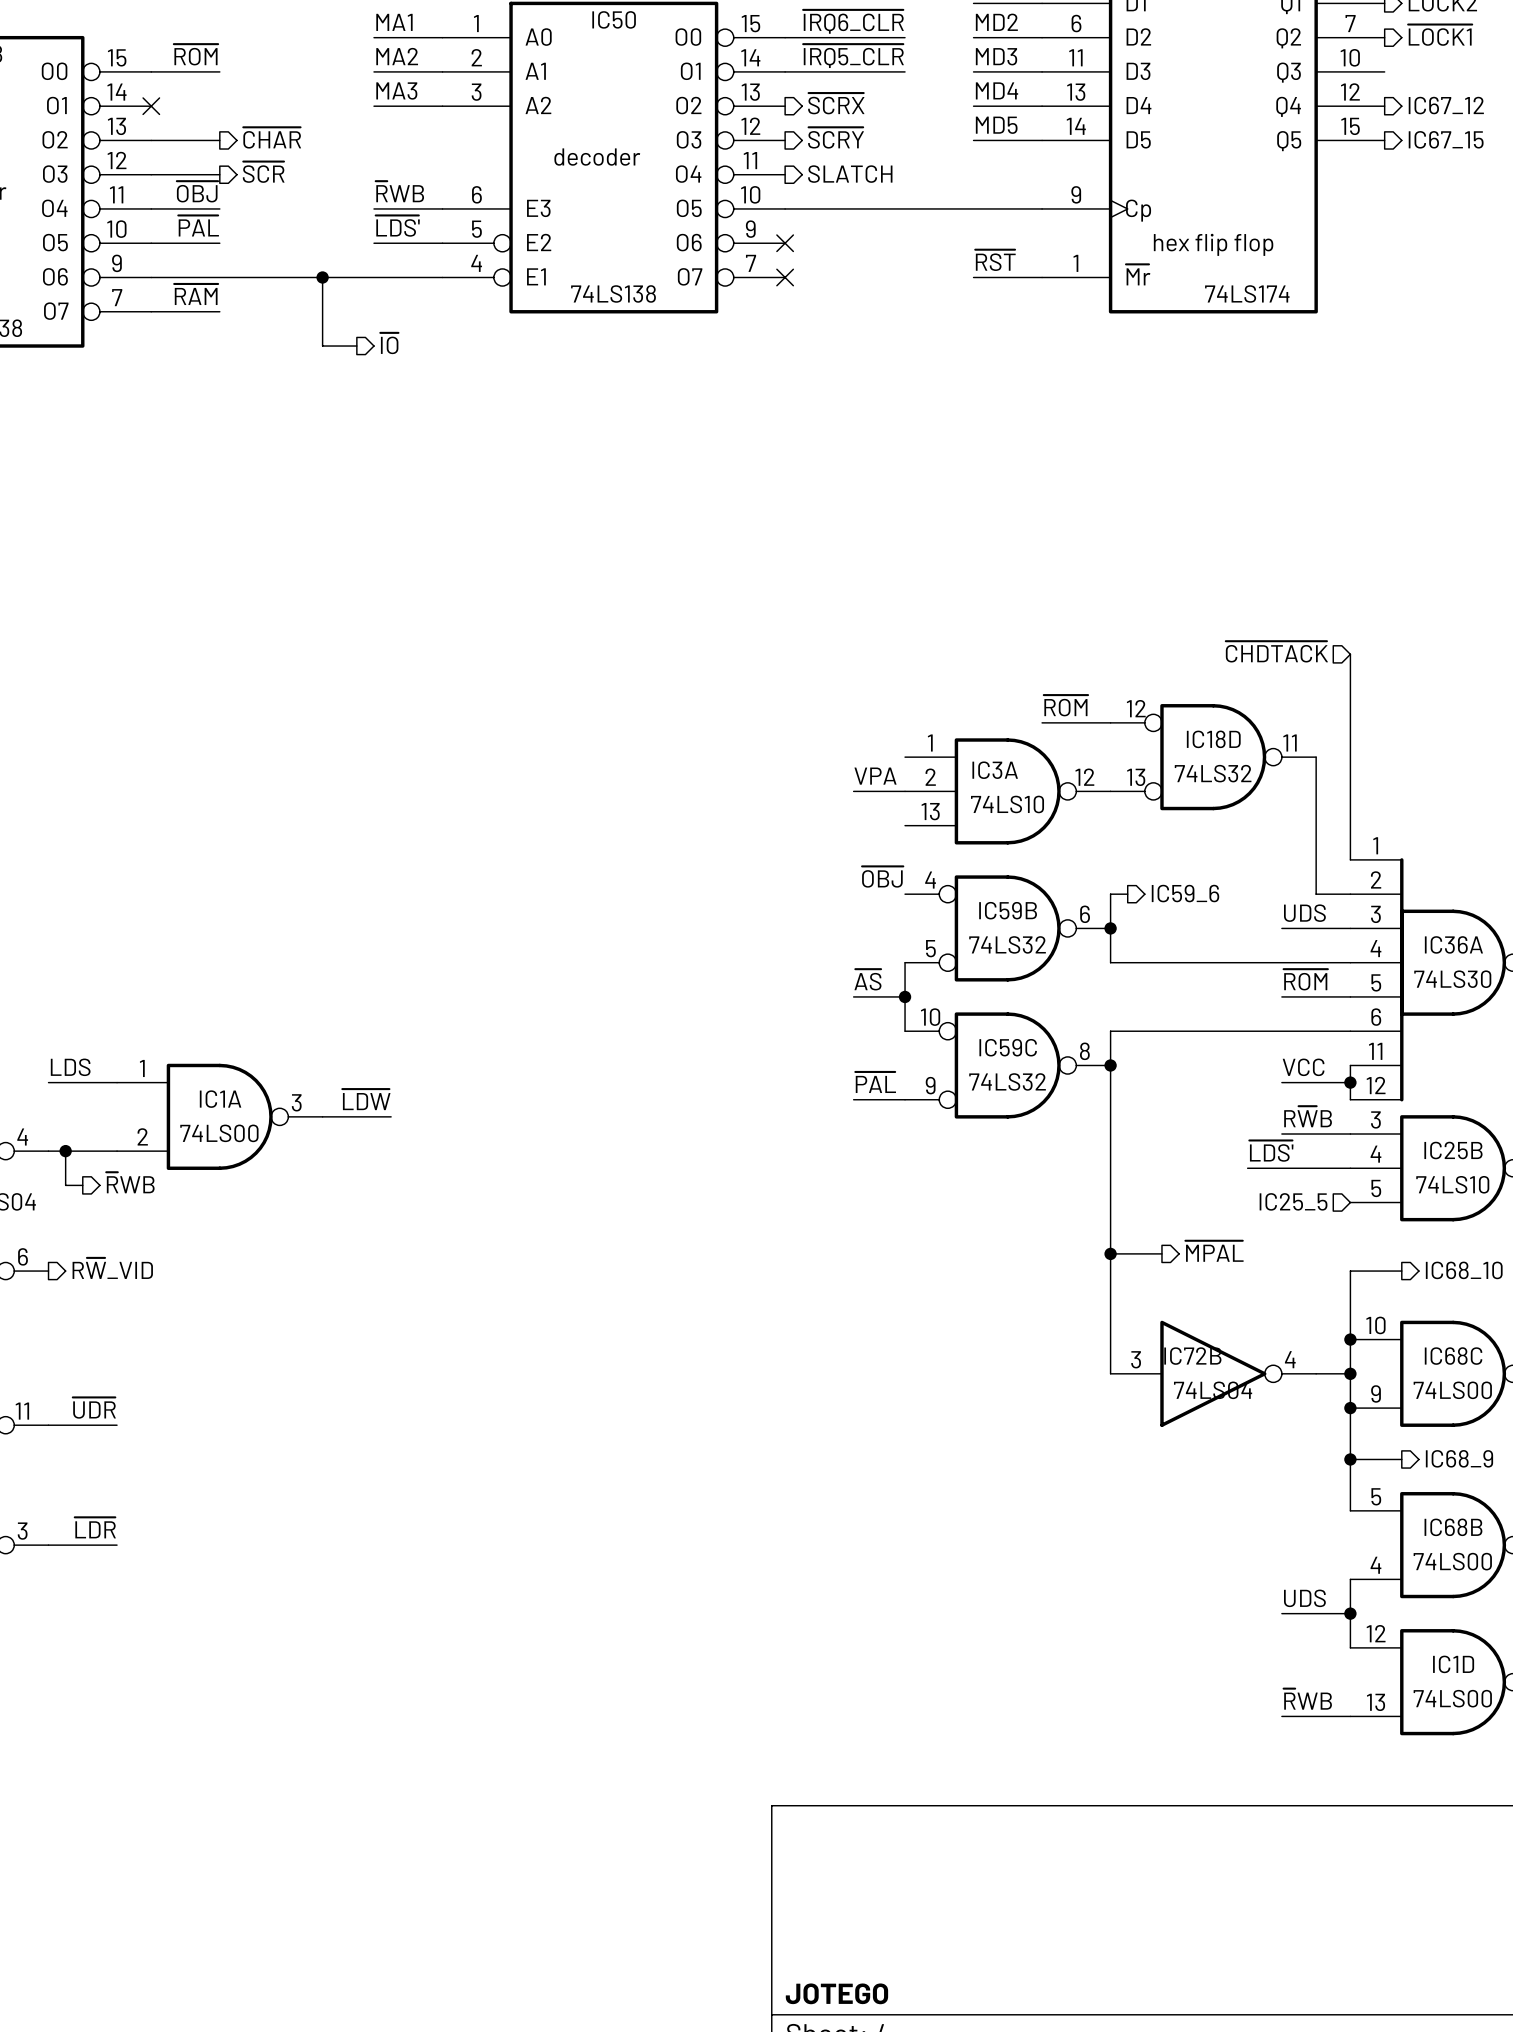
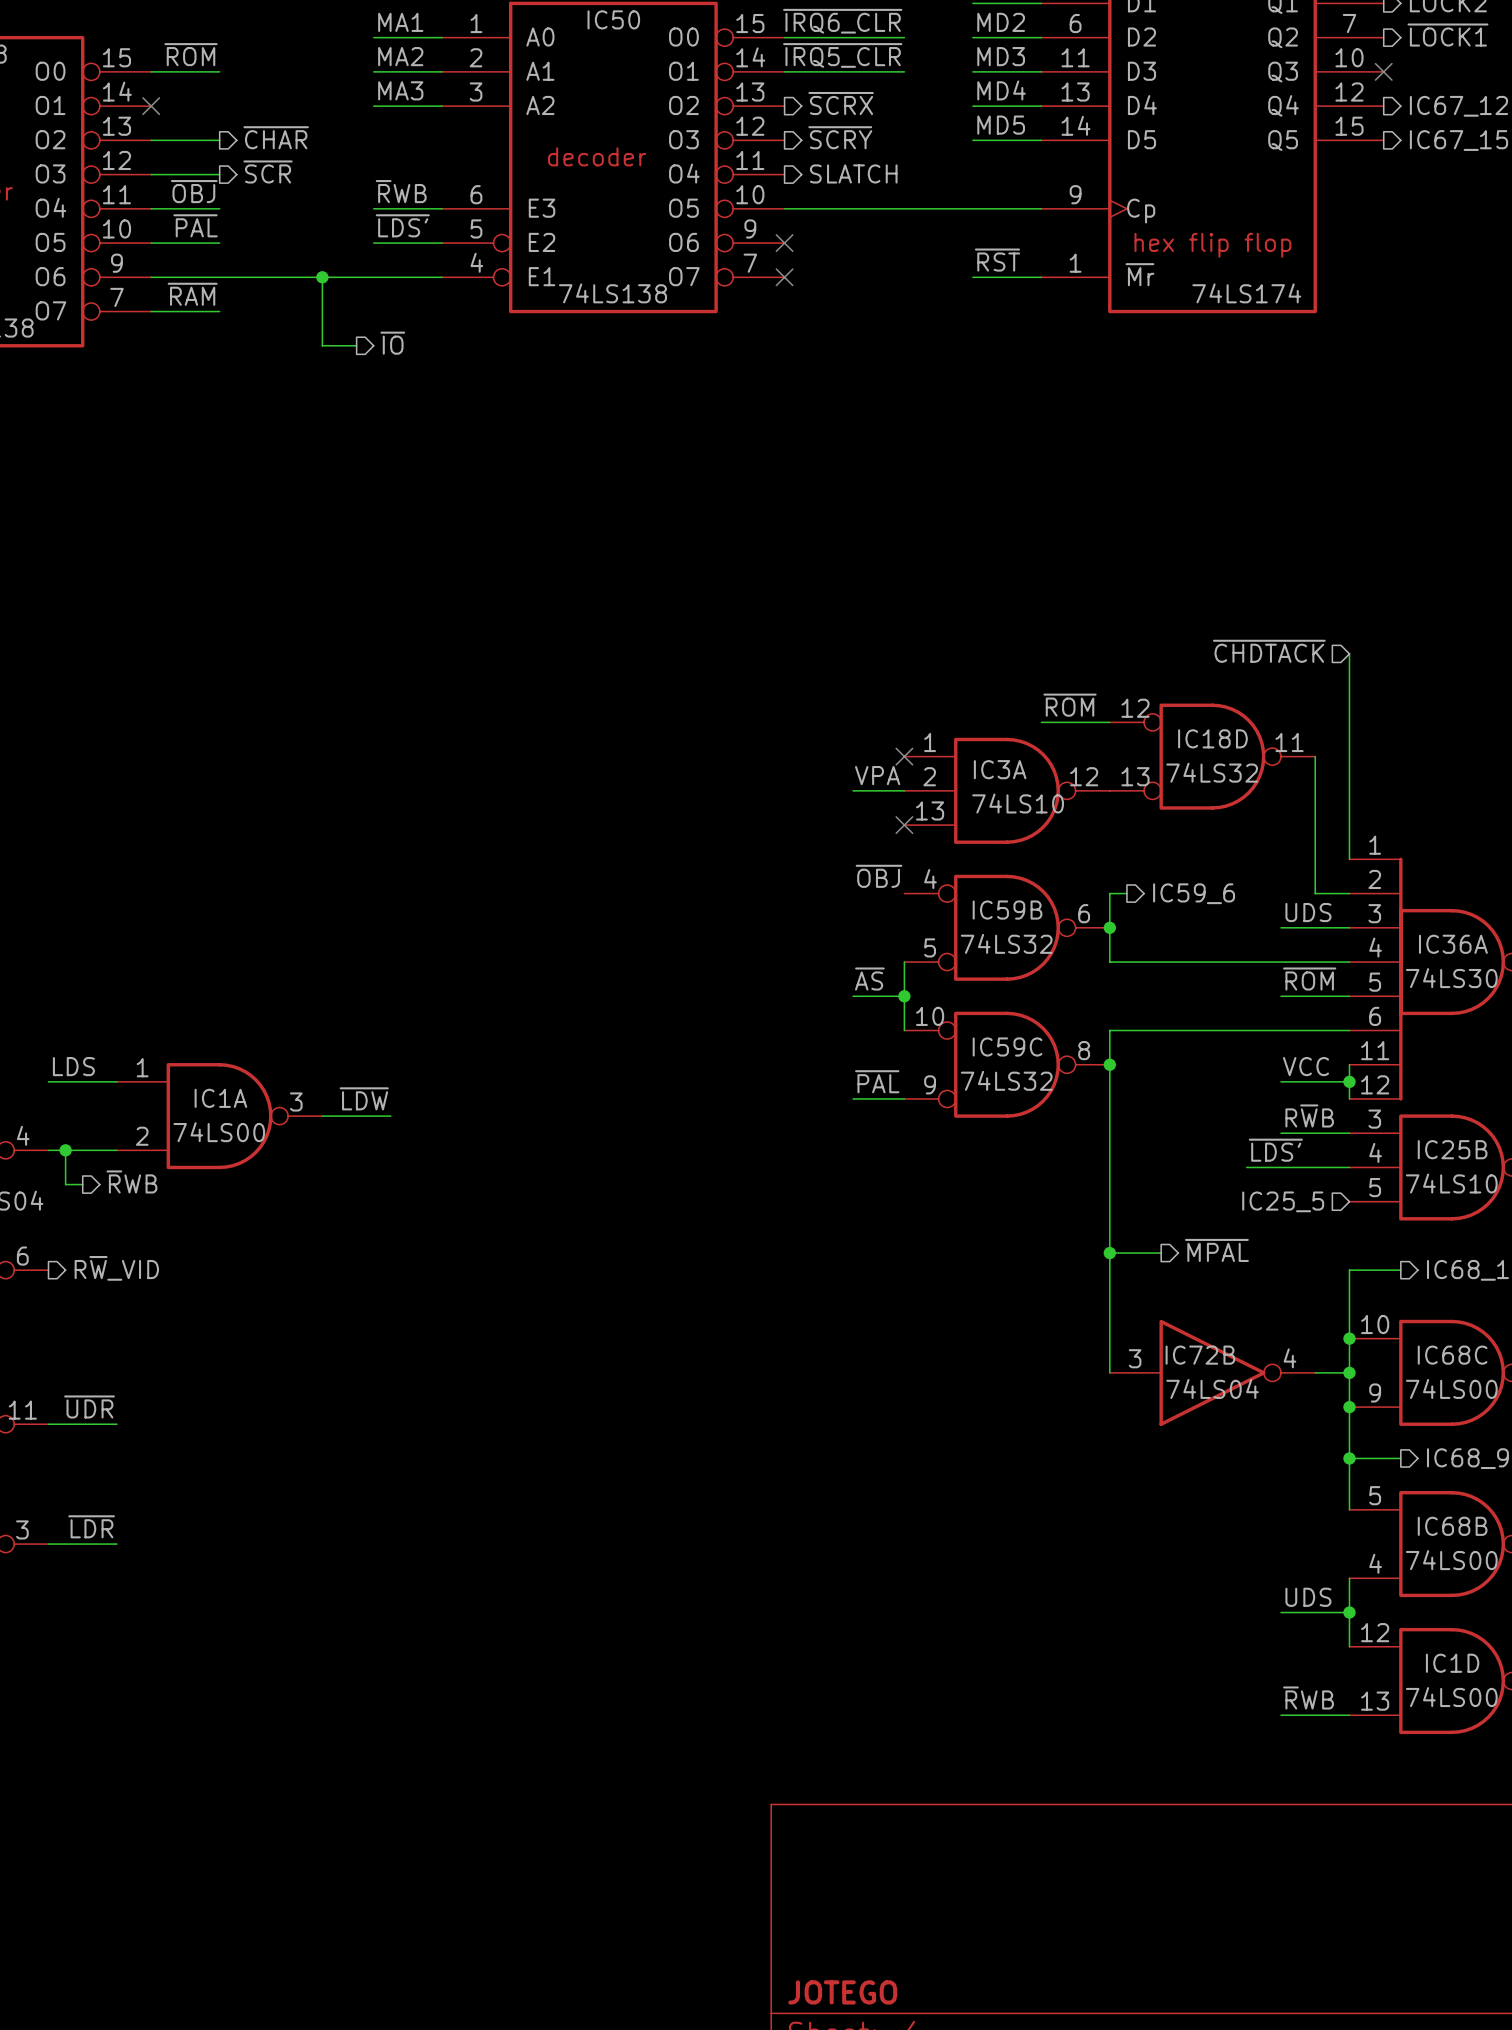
no-connect mark: none -> (1383, 71)
no-connect mark: none -> (904, 756)
no-connect mark: none -> (904, 825)

